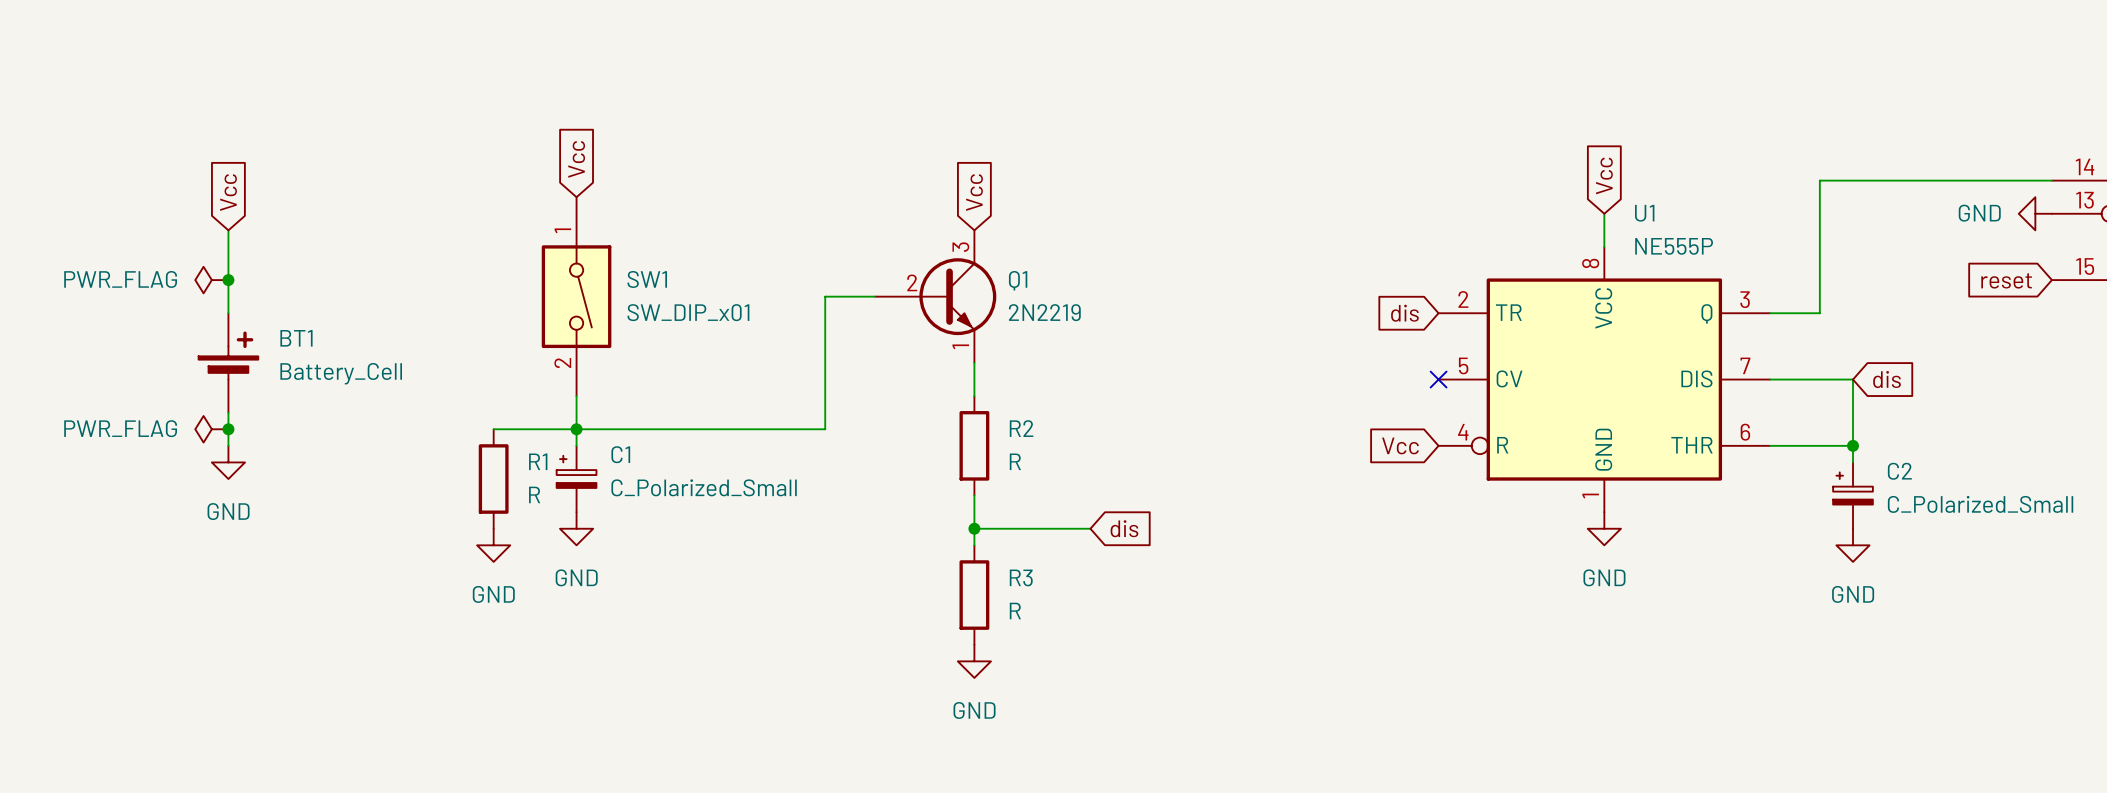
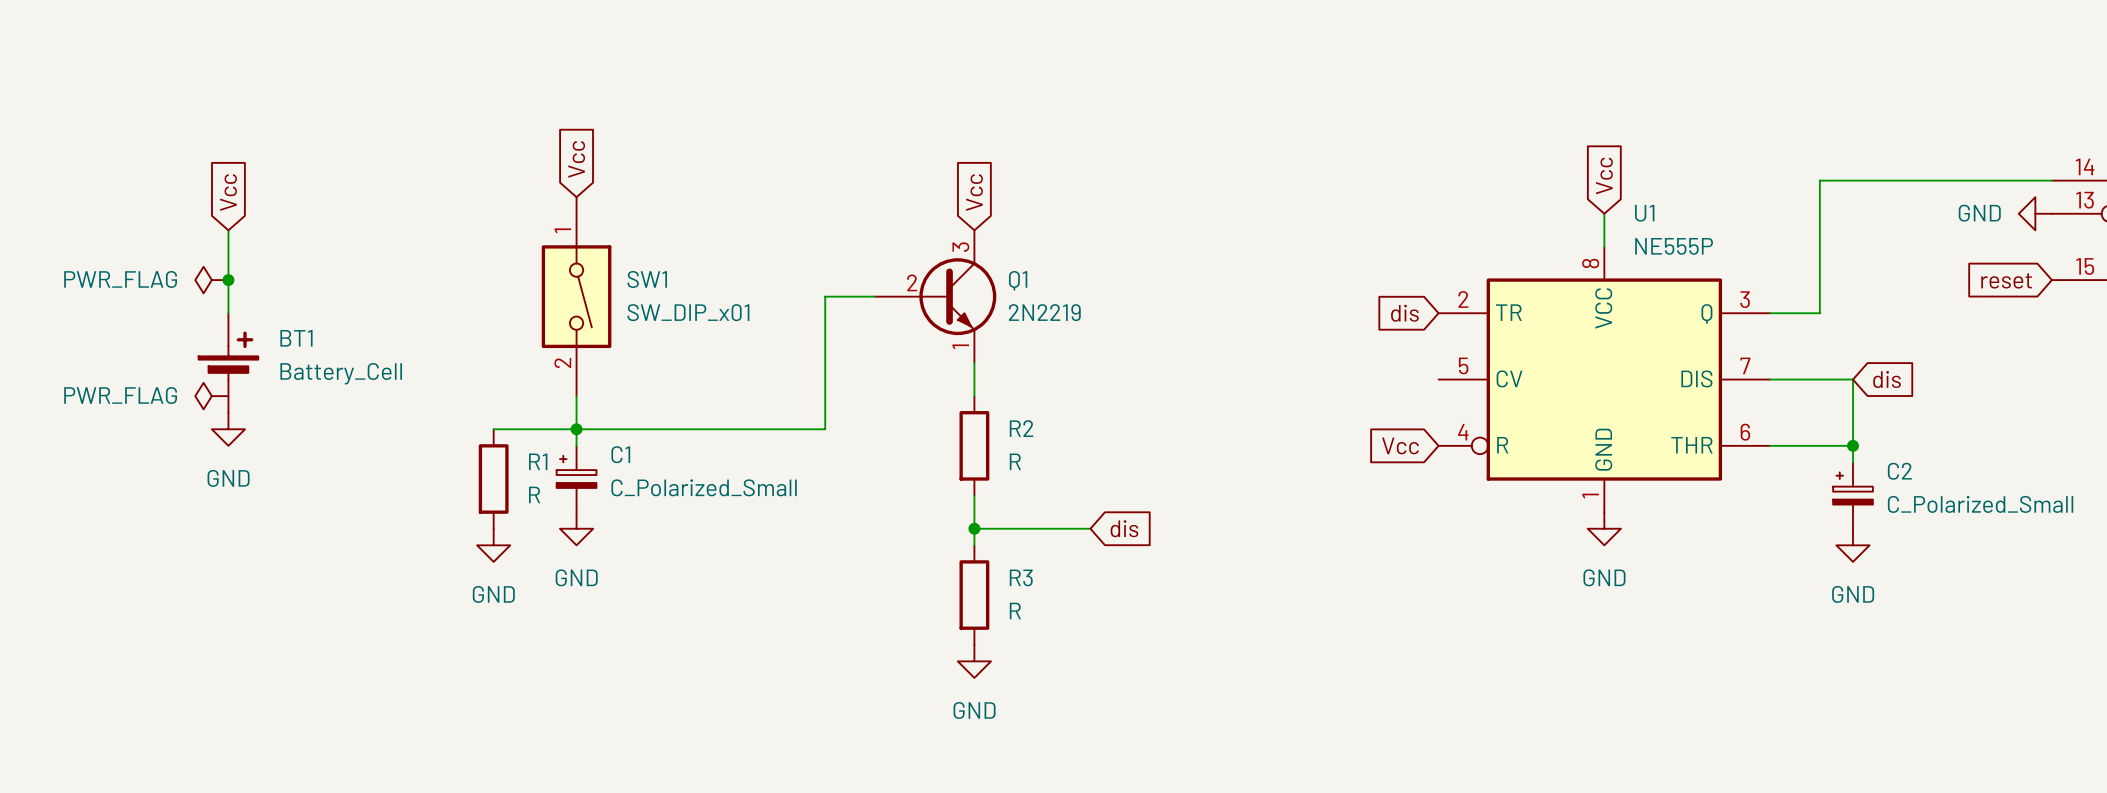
no-connect mark: (1438, 379) -> none
power symbol position: PWR_FLAG (211, 429) -> PWR_FLAG (211, 396)
junction: (228, 429) -> none
power symbol position: GND (228, 462) -> GND (228, 429)

